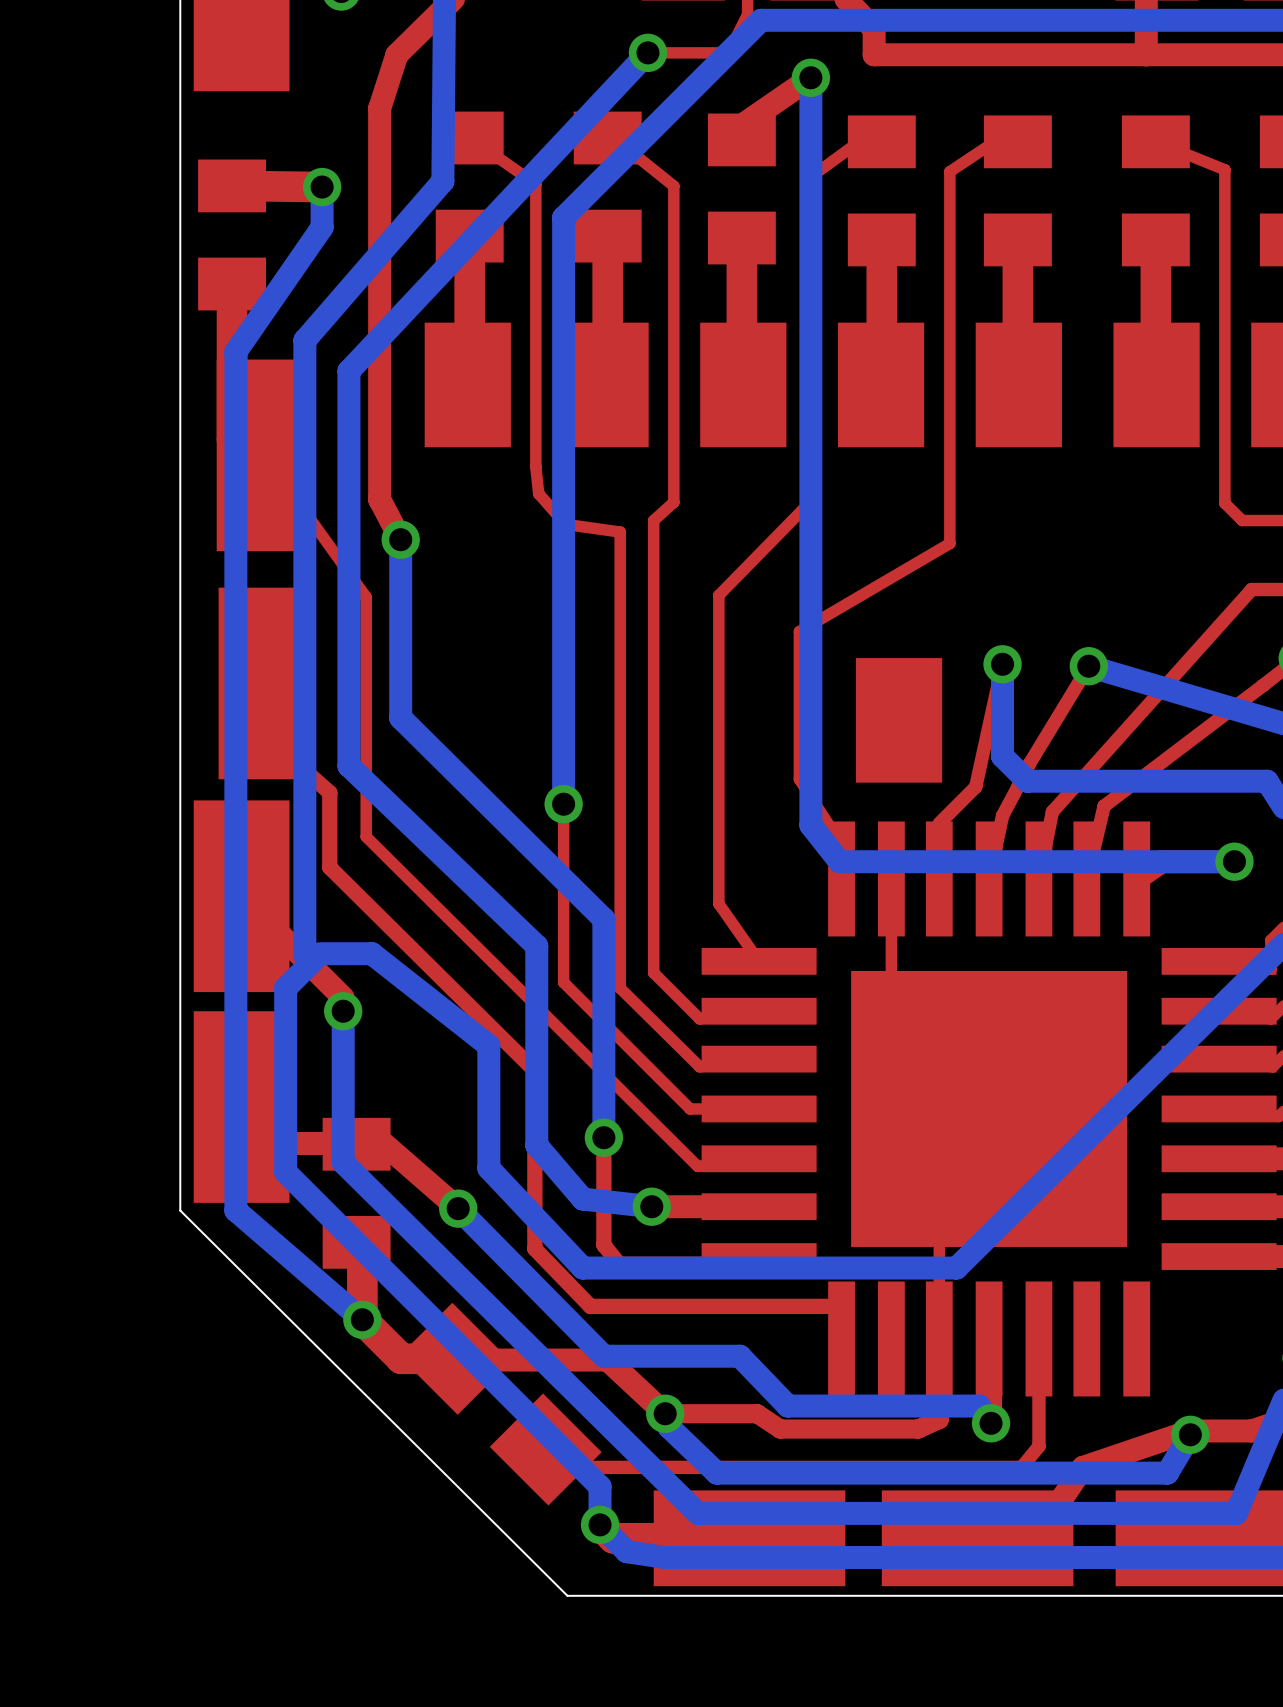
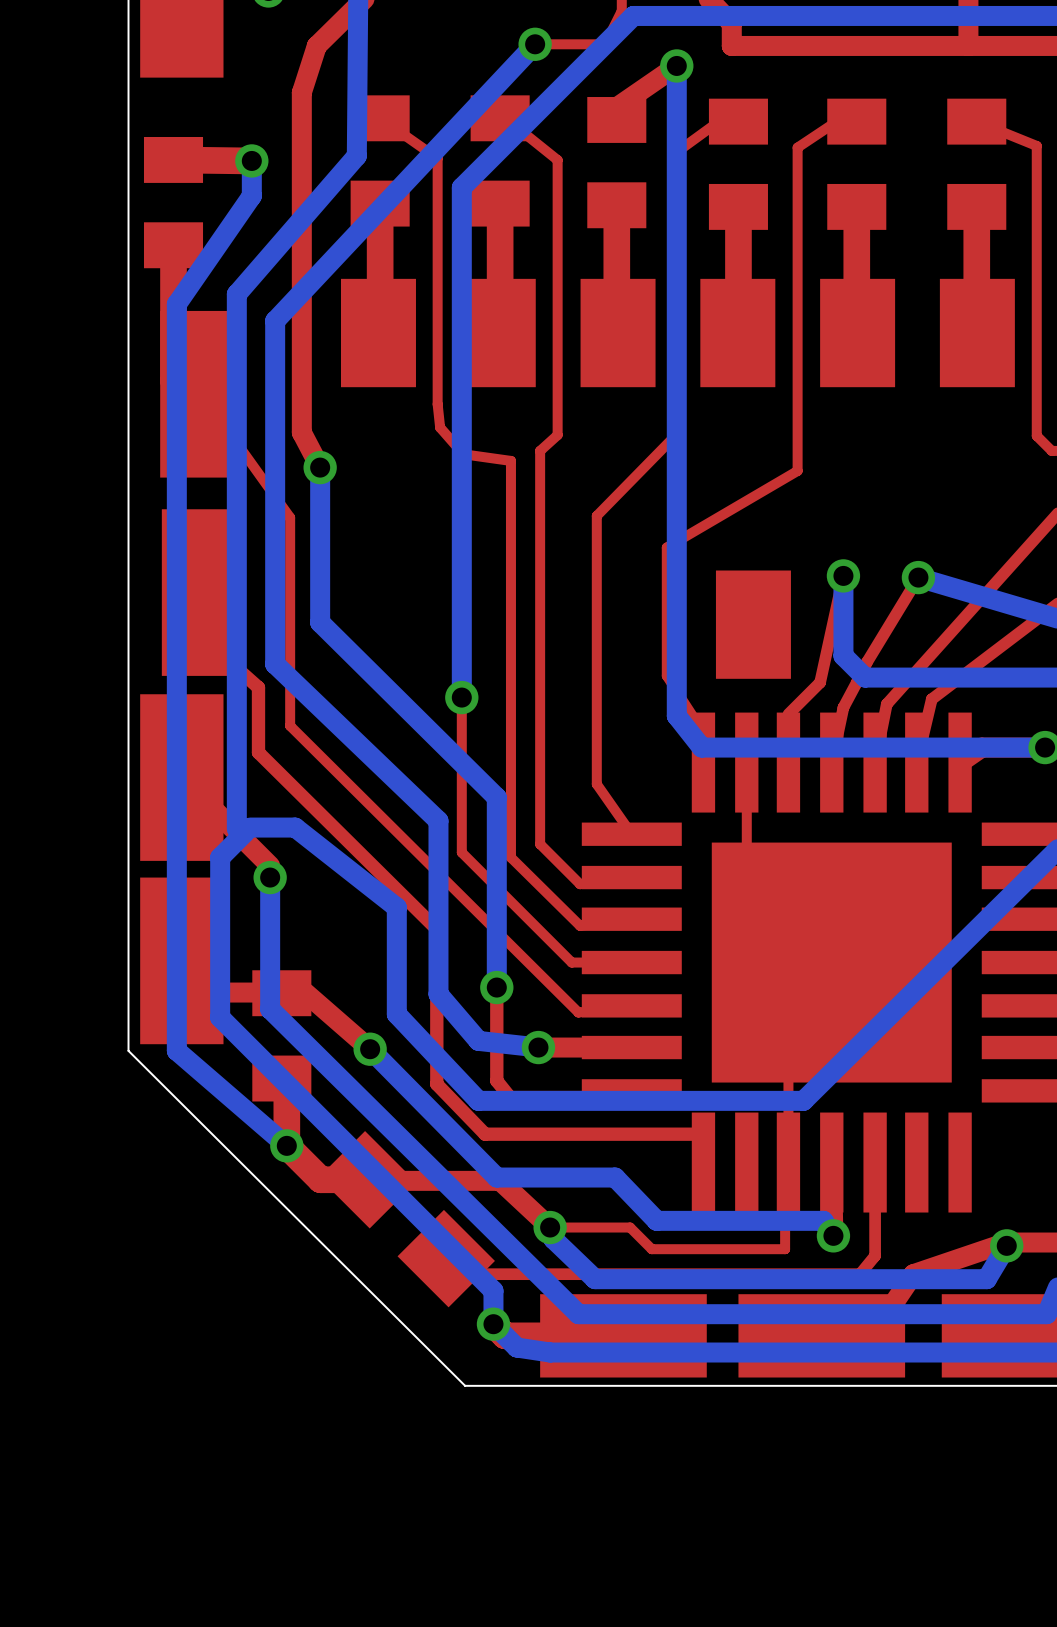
top track: (935, 1350) (939, 1350) (939, 1419) (918, 1429) (780, 1429) (757, 1413) -> (785, 1172) (785, 1249) (651, 1249) (630, 1227)
top track width: thick (757, 1413) (665, 1413) -> thin (630, 1227) (550, 1227)

